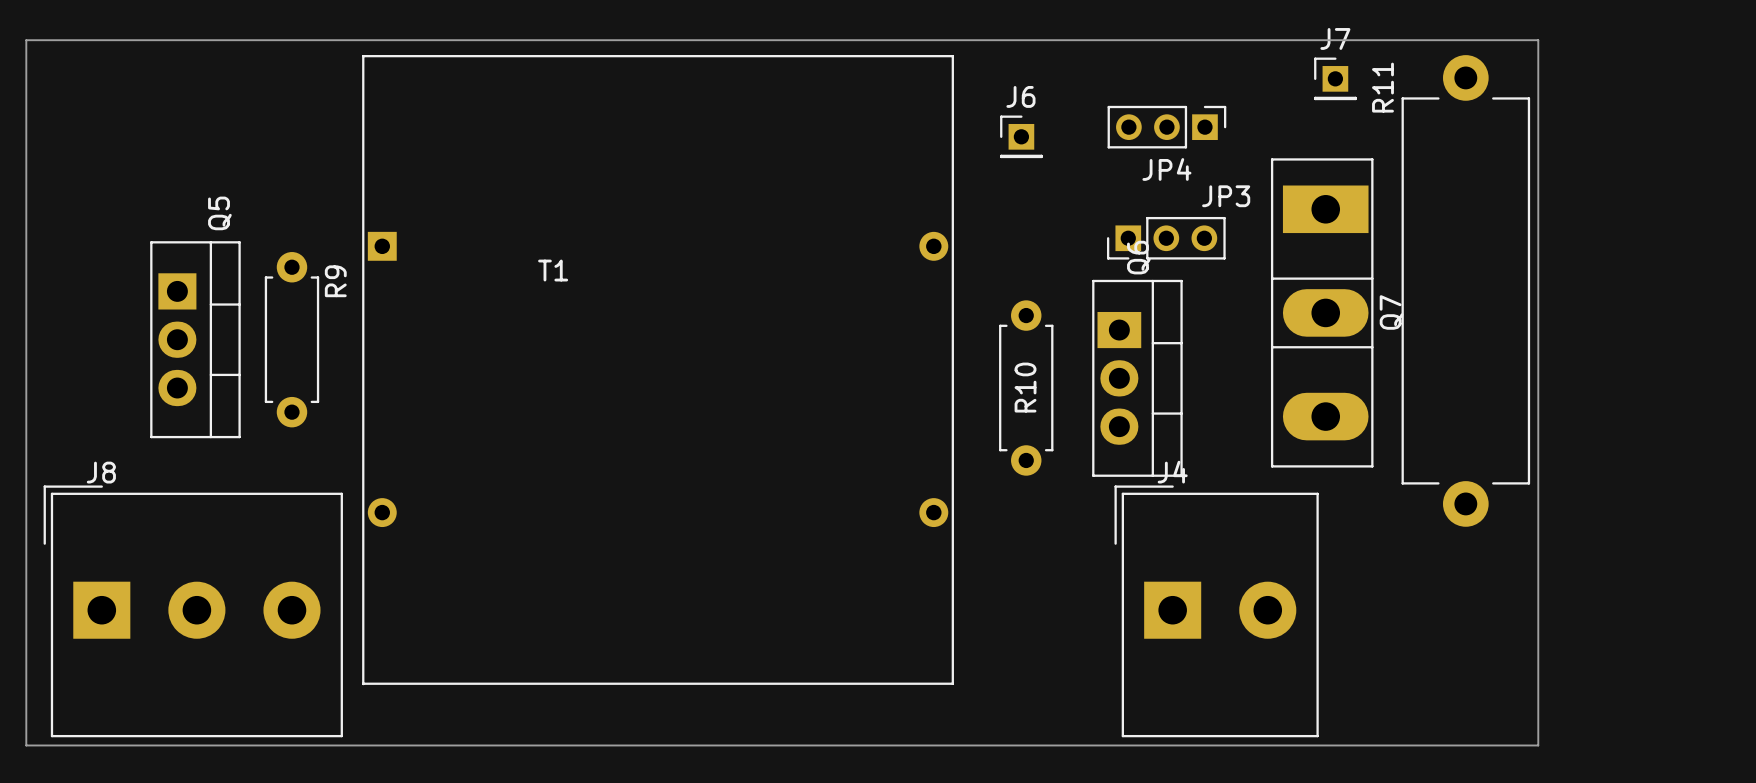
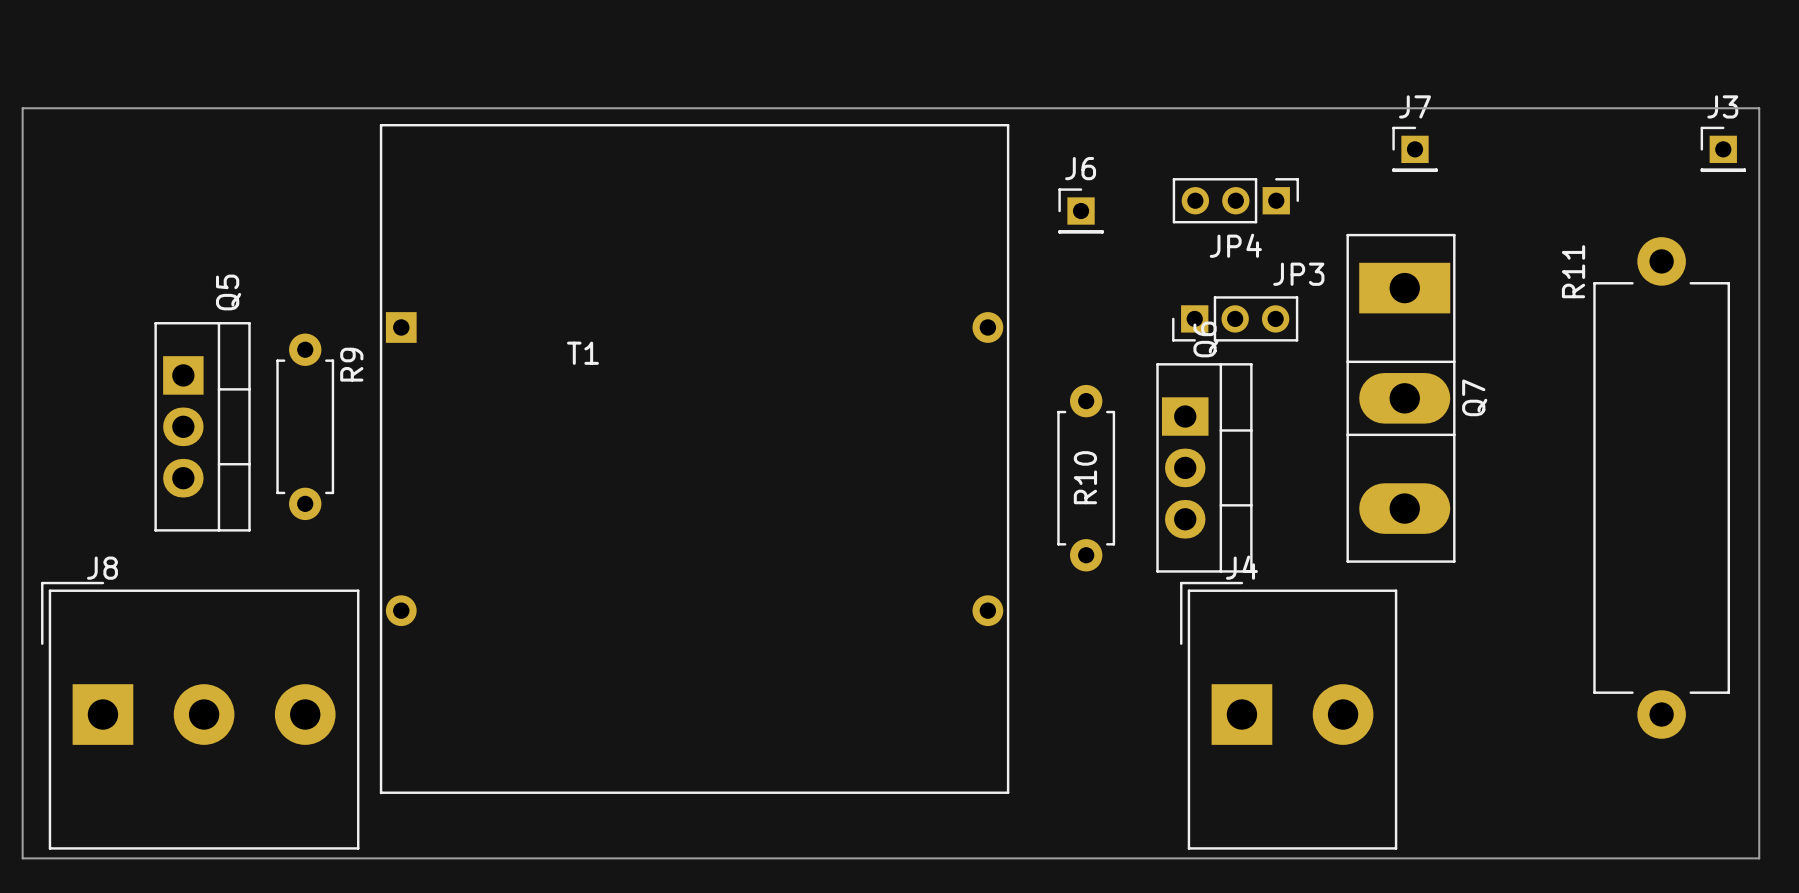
board edge: (1538, 40) (1538, 745) -> (1630, 108) (1759, 108) (1759, 858) (1630, 858)
J3: none -> (1723, 149)
R11 position: (1465, 290) -> (1661, 487)

